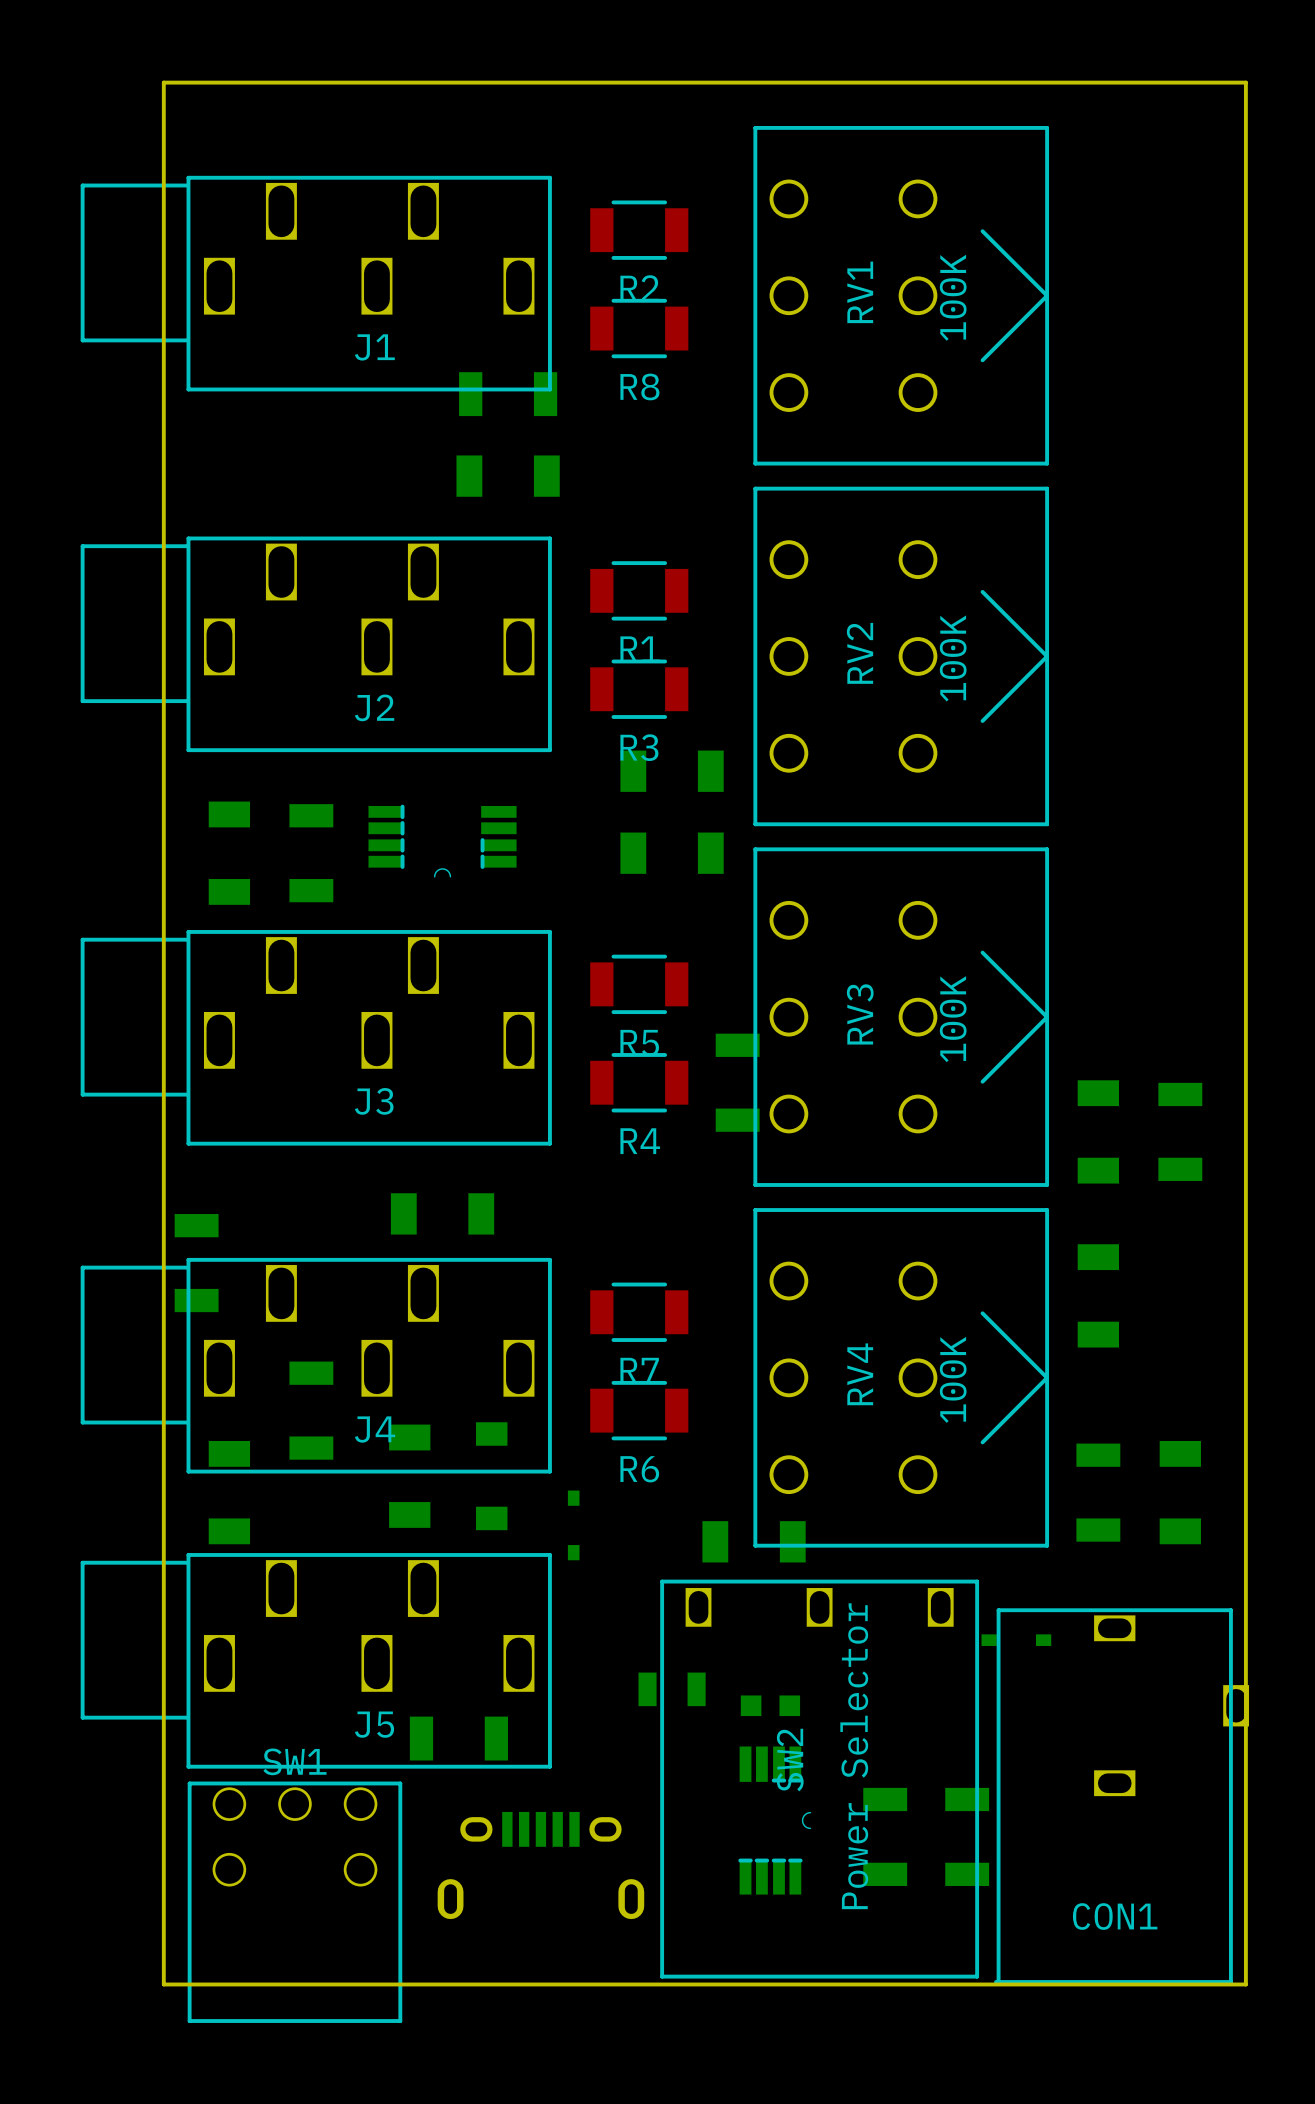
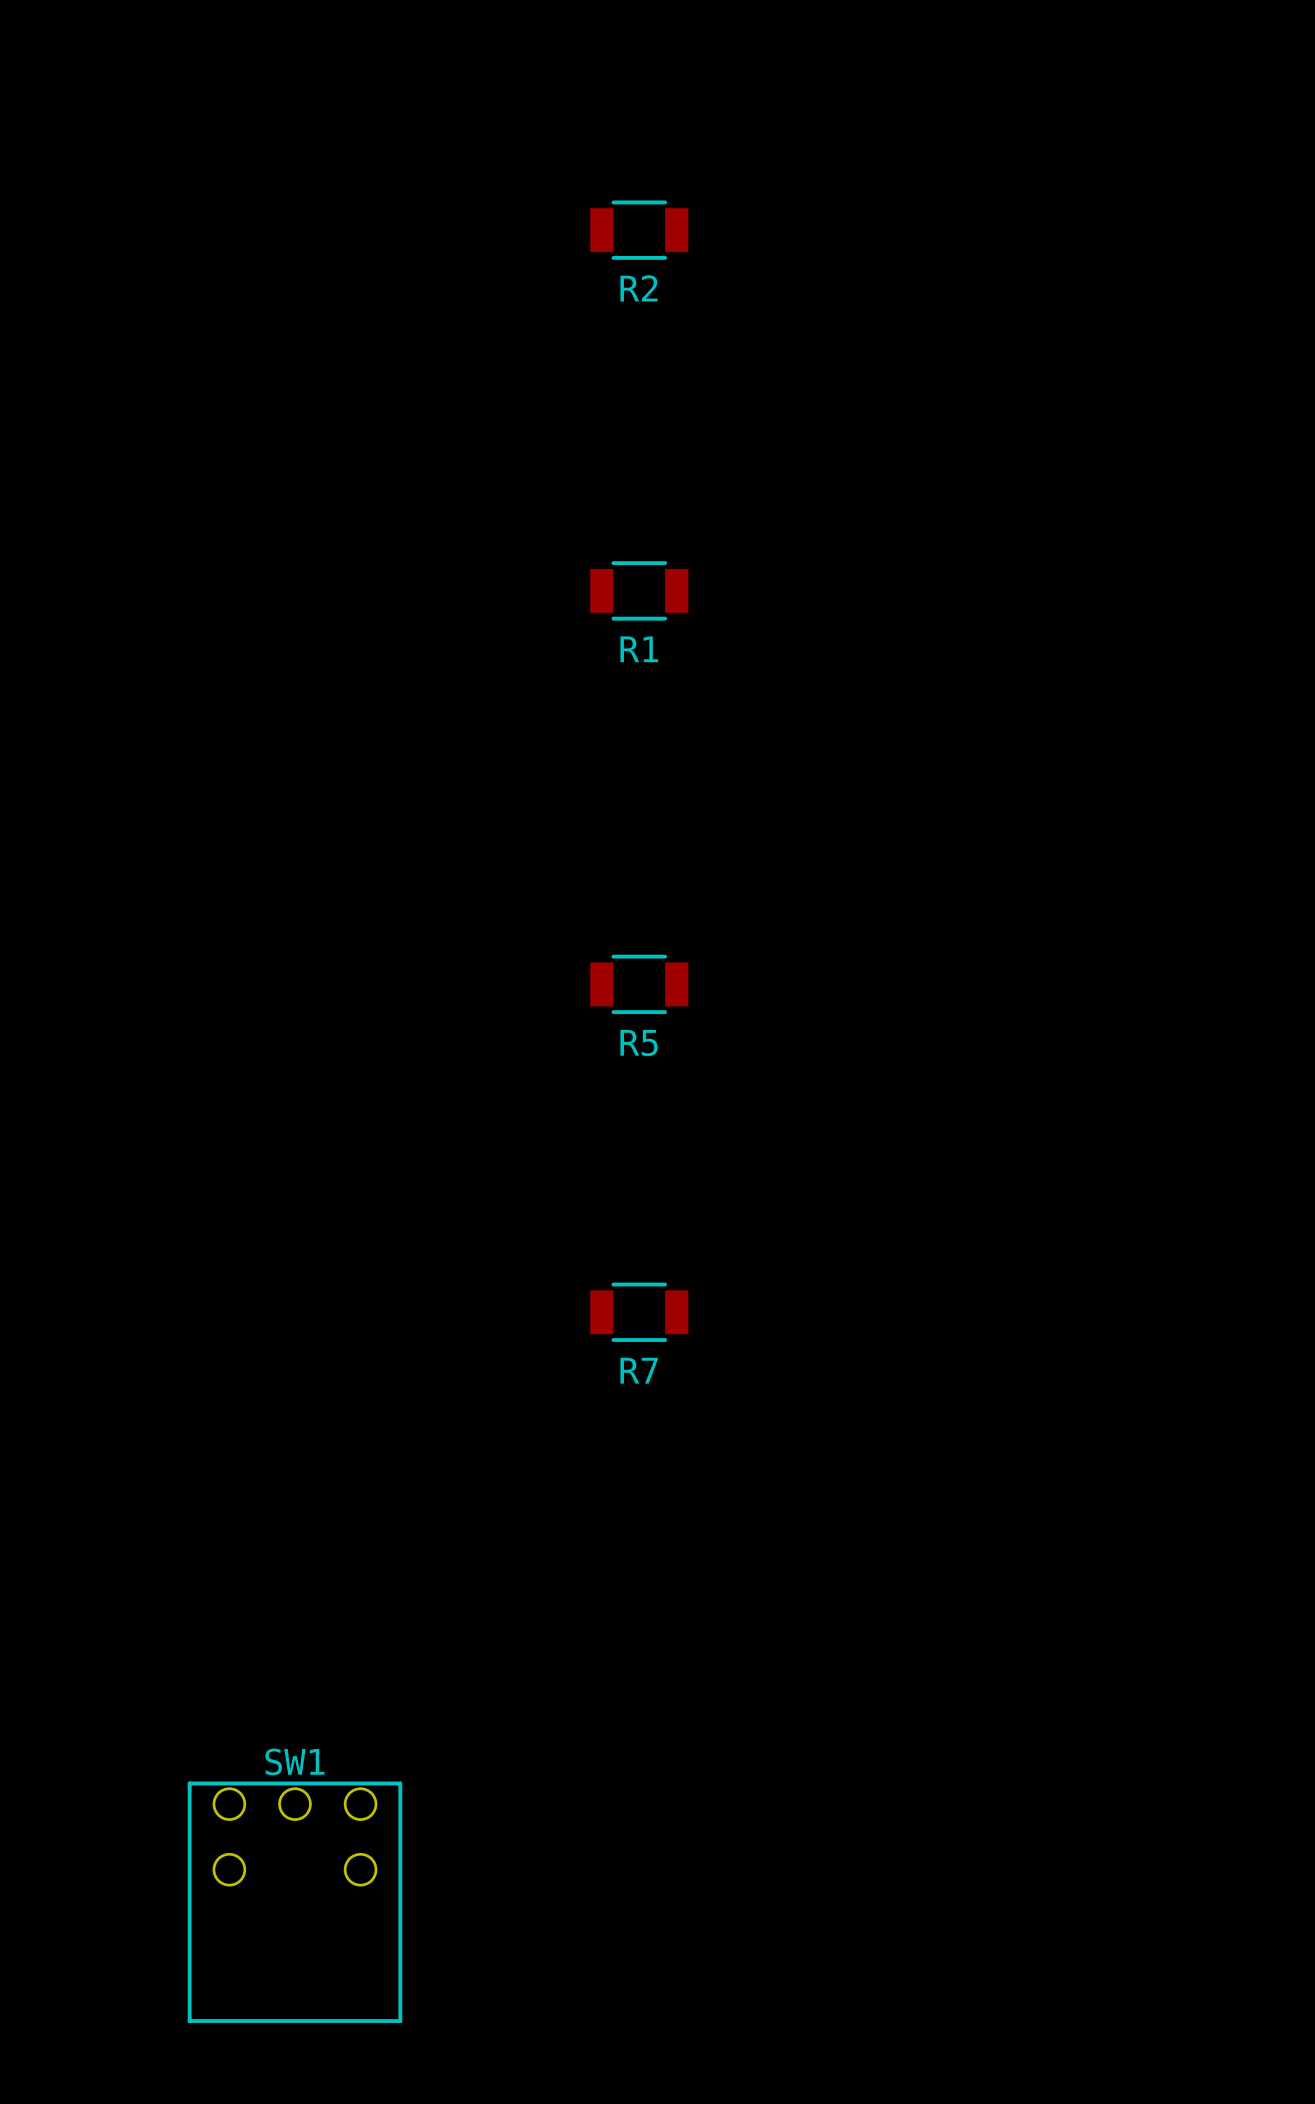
board edge: (163, 82) (1245, 82) (1245, 1984) (163, 1984) (163, 82) -> none
J1: (316, 283) -> none
RV1: 100K (901, 295) -> none
R8: (639, 328) -> none
part: (508, 394) -> none
part: (508, 476) -> none
J2: (316, 644) -> none
RV2: 100K (901, 656) -> none
R3: (639, 689) -> none
part: (672, 771) -> none
part: (442, 840) -> none
part: (229, 853) -> none
part: (311, 853) -> none
part: (672, 853) -> none
RV3: 100K (901, 1017) -> none
J3: (316, 1037) -> none
R4: (639, 1082) -> none
part: (737, 1082) -> none
part: (1098, 1131) -> none
part: (1180, 1131) -> none
part: (442, 1213) -> none
part: (196, 1263) -> none
part: (1098, 1295) -> none
J4: (316, 1365) -> none
RV4: 100K (901, 1377) -> none
part: (311, 1410) -> none
R6: (639, 1410) -> none
part: (409, 1476) -> none
part: (491, 1476) -> none
part: (229, 1492) -> none
part: (1098, 1492) -> none
part: (1180, 1492) -> none
part: (573, 1525) -> none
part: (754, 1541) -> none
part: (1016, 1640) -> none
J5: (316, 1660) -> none
part: (672, 1689) -> none
part: (770, 1705) -> none
part: (458, 1738) -> none
SW2: Power Selector (819, 1779) -> none
CON1: (1121, 1796) -> none
part: (774, 1820) -> none
part: (885, 1836) -> none
part: (967, 1836) -> none
part: (540, 1865) -> none

